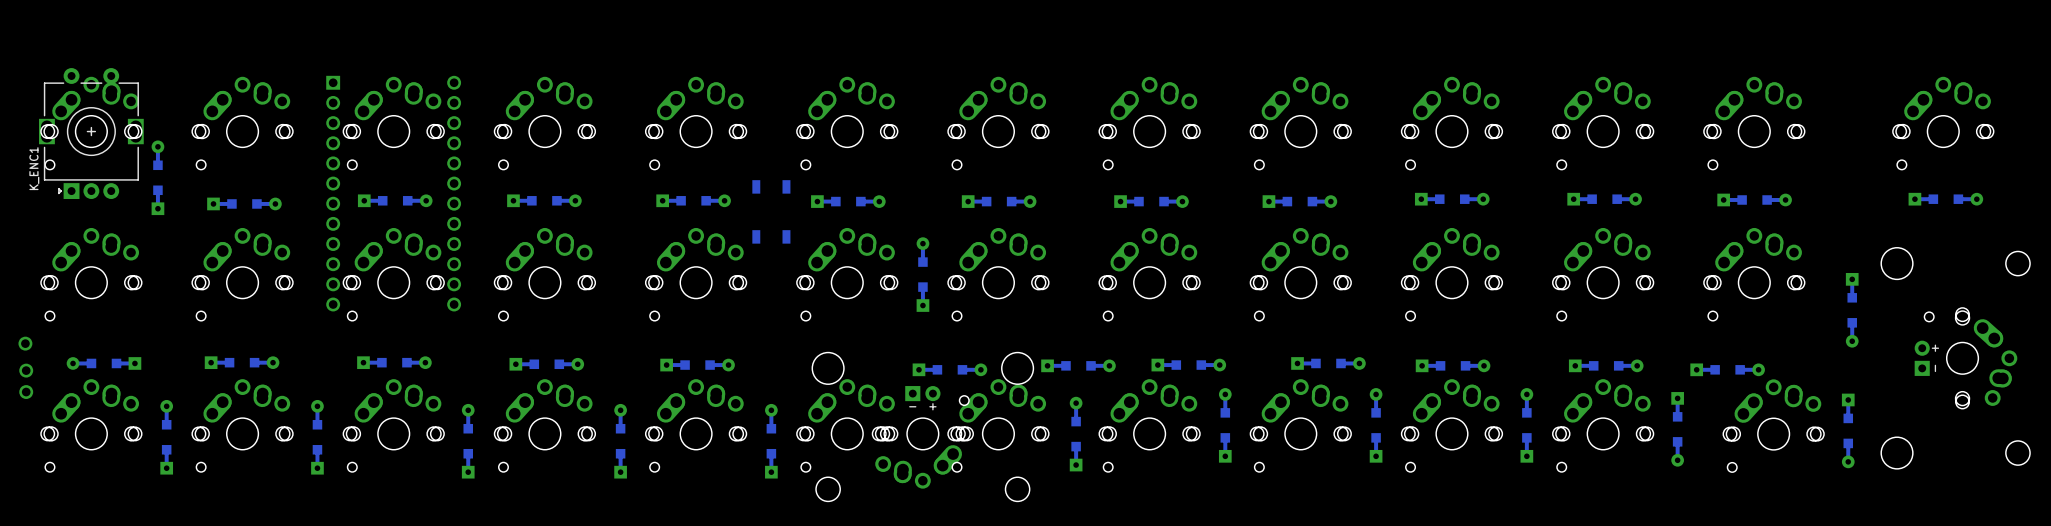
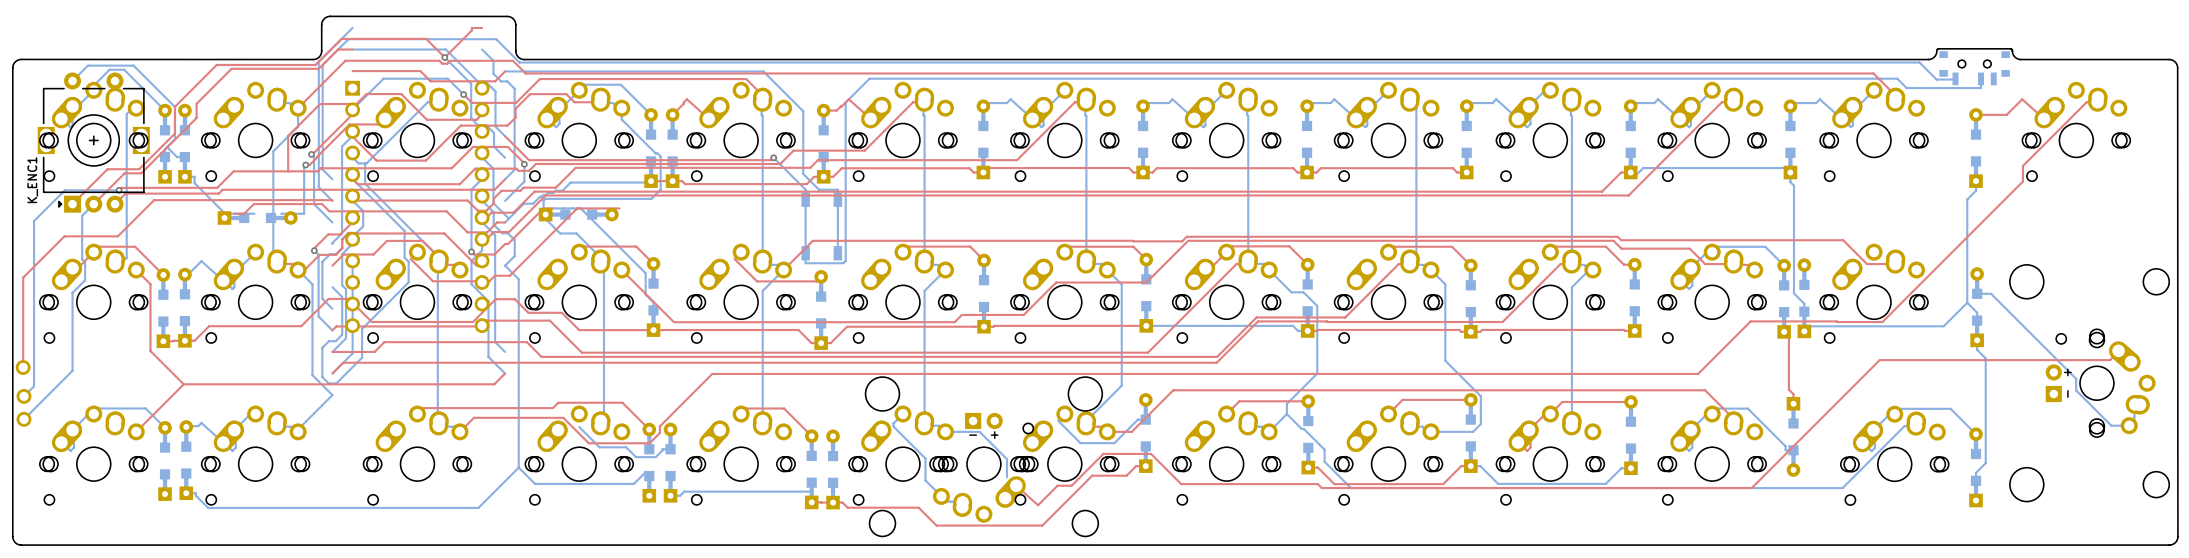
board edge: none -> (515, 24) (516, 53) (519, 57) (524, 59) (1928, 59) (1934, 57) (1936, 51)
board edge: none -> (515, 24) (513, 18) (507, 16) (329, 16) (321, 22) (321, 54) (314, 59) (21, 59) (15, 61) (12, 67) (12, 536) (15, 542) (21, 545) (2169, 545)
bottom track: none -> (352, 27) (318, 61) (318, 187) (332, 200)
top track: none -> (482, 27) (471, 27) (471, 30) (444, 57) (426, 38) (341, 38) (315, 64) (216, 64) (174, 106) (174, 133) (139, 169) (107, 169) (72, 204)
board edge: none -> (2010, 48) (2012, 51)
board edge: none -> (2010, 48) (1938, 48) (1936, 50)
bottom track: none -> (352, 49) (445, 49) (478, 81) (485, 81) (495, 91) (495, 126) (505, 136)
top track: none -> (352, 49) (338, 49) (318, 68) (231, 68) (196, 103) (196, 117) (141, 173) (124, 173) (93, 204)
bottom track: none -> (482, 49) (493, 60) (493, 73) (501, 81) (507, 81) (514, 88) (514, 169) (505, 179)
board edge: none -> (2012, 51) (2014, 57) (2020, 59)
bottom track: none -> (444, 57) (471, 83) (471, 118) (477, 125) (486, 125) (494, 132) (494, 146) (505, 157)
via: none -> (444, 57)
board edge: none -> (2020, 59) (2169, 59) (2174, 61) (2177, 65) (2177, 536) (2175, 542) (2169, 545)
part: none -> (1974, 68)
top track: none -> (352, 71) (420, 71) (430, 81) (495, 81) (505, 71)
bottom track: none -> (505, 71) (763, 71) (803, 111) (803, 173) (819, 189) (837, 189) (837, 253)
bottom track: none -> (1955, 78) (1936, 79) (1919, 62) (519, 62) (496, 39) (348, 39) (322, 64) (322, 169) (332, 179)
bottom track: none -> (1980, 78) (1980, 88) (1906, 88) (1897, 78) (869, 78) (845, 102) (845, 260) (843, 263) (805, 263) (805, 189) (773, 157)
bottom track: none -> (72, 80) (87, 65) (133, 65) (174, 106) (174, 139) (165, 149) (165, 176)
bottom track: none -> (1064, 90) (1048, 106) (1043, 106) (1043, 125) (1041, 127) (1010, 99) (1006, 103) (983, 103) (983, 126)
bottom track: none -> (1226, 90) (1210, 106) (1205, 106) (1205, 125) (1203, 127) (1172, 99) (1168, 103) (1143, 103) (1143, 126)
bottom track: none -> (1388, 90) (1372, 106) (1367, 106) (1367, 125) (1365, 127) (1334, 99) (1330, 103) (1307, 103) (1307, 126)
bottom track: none -> (1550, 90) (1545, 90) (1529, 106) (1530, 124) (1527, 127) (1496, 99) (1492, 103) (1466, 103) (1466, 126)
bottom track: none -> (1712, 90) (1696, 106) (1690, 106) (1690, 125) (1689, 127) (1658, 99) (1654, 103) (1630, 103) (1630, 126)
bottom track: none -> (1874, 90) (1857, 106) (1852, 106) (1852, 125) (1850, 127) (1819, 99) (1816, 103) (1790, 103) (1790, 126)
bottom track: none -> (463, 94) (447, 78) (383, 78) (352, 109) (352, 114)
top track: none -> (463, 94) (471, 102) (516, 102) (539, 79) (746, 79) (762, 95) (762, 102)
via: none -> (463, 94)
bottom track: none -> (277, 97) (276, 102) (289, 103) (294, 108) (298, 108) (298, 126) (273, 151) (273, 255) (277, 259)
bottom track: none -> (439, 97) (438, 102) (427, 102) (366, 163) (358, 163) (352, 157)
bottom track: none -> (600, 97) (600, 102) (613, 103) (618, 108) (621, 108) (621, 119) (660, 156) (660, 189) (651, 198) (545, 198) (543, 200) (543, 216) (560, 233) (576, 233) (600, 257) (600, 264) (604, 267) (604, 417) (600, 420)
top track: none -> (924, 97) (924, 102) (913, 102) (864, 150) (793, 150) (780, 163) (535, 163) (529, 170) (518, 170) (516, 168) (475, 168) (459, 184) (357, 184) (352, 178)
bottom track: none -> (1086, 97) (1086, 263)
bottom track: none -> (1248, 97) (1248, 263)
bottom track: none -> (1571, 97) (1571, 264) (1584, 264) (1589, 270)
top track: none -> (1733, 97) (1733, 102) (1721, 102) (1628, 195) (545, 195) (509, 232) (493, 232) (482, 243)
top track: none -> (1895, 97) (1873, 73) (525, 73) (513, 60) (450, 60) (447, 63) (442, 63) (439, 60) (345, 60) (298, 108)
top track: none -> (600, 102) (574, 102) (566, 94) (530, 94) (515, 108) (515, 117) (507, 125) (460, 125) (425, 160) (376, 160) (352, 135)
bottom track: none -> (762, 102) (762, 259)
bottom track: none -> (924, 102) (924, 264) (940, 264) (945, 270) (924, 290) (924, 425)
top track: none -> (1086, 102) (1074, 102) (1017, 160) (817, 160) (810, 167) (575, 167) (555, 187) (523, 187) (520, 190) (501, 190) (486, 210) (477, 210) (467, 200) (352, 200)
bottom track: none -> (1410, 101) (1416, 108) (1416, 252) (1409, 259) (1409, 264) (1425, 264) (1445, 284) (1445, 360) (1480, 396) (1480, 424) (1473, 431) (1427, 431) (1422, 426) (1409, 425) (1410, 420)
top track: none -> (2097, 102) (2086, 102) (2022, 165) (2022, 181) (1882, 322) (1750, 321) (1698, 373) (712, 373) (659, 426) (659, 432) (649, 443) (588, 443) (563, 417) (473, 417) (459, 431)
bottom track: none -> (136, 108) (132, 108) (126, 114) (126, 257) (115, 259) (115, 264)
top track: none -> (823, 110) (836, 110) (848, 99) (870, 118)
top track: none -> (352, 114) (311, 154)
top track: none -> (482, 114) (476, 119) (426, 119) (401, 94) (366, 94) (356, 104) (320, 104) (288, 136) (288, 171)
top track: none -> (672, 114) (686, 99) (708, 118)
top track: none -> (1976, 114) (2006, 114) (2022, 99) (2043, 118)
bottom track: none -> (61, 118) (70, 127) (72, 125) (72, 106) (77, 106) (93, 90) (93, 85) (109, 69) (124, 69) (165, 110) (165, 130)
top track: none -> (385, 118) (379, 124) (349, 124) (309, 164) (305, 164)
bottom track: none -> (546, 118) (556, 127) (559, 124) (558, 106) (563, 106) (584, 84) (620, 84) (651, 114) (651, 134)
bottom track: none -> (352, 135) (342, 146) (342, 233) (332, 244)
top track: none -> (505, 136) (529, 160) (771, 160) (773, 157)
part: none -> (983, 139)
part: none -> (1143, 139)
part: none -> (1307, 139)
part: none -> (1466, 139)
part: none -> (1630, 139)
part: none -> (1790, 139)
part: none -> (165, 143)
part: none -> (184, 143)
part: none -> (823, 143)
bottom track: none -> (167, 147) (177, 157) (184, 157) (184, 176) (194, 176) (194, 183) (225, 213) (254, 213)
part: none -> (651, 148)
part: none -> (672, 148)
part: none -> (1976, 148)
bottom track: none -> (1630, 152) (1630, 175) (1635, 175) (1643, 168) (1790, 168)
bottom track: none -> (1790, 152) (1790, 182) (1794, 185) (1794, 293) (1804, 303) (1804, 331)
bottom track: none -> (311, 154) (314, 157) (314, 204) (332, 222)
via: none -> (311, 154)
bottom track: none -> (482, 157) (493, 168) (493, 203) (508, 218)
via: none -> (773, 157)
bottom track: none -> (1976, 161) (1976, 190) (1967, 199) (1967, 302)
bottom track: none -> (365, 163) (365, 183) (439, 259)
bottom track: none -> (524, 164) (524, 181) (505, 200)
top track: none -> (524, 164) (507, 146) (473, 146) (451, 168) (321, 168) (317, 171) (233, 171) (217, 187) (121, 187) (119, 190)
via: none -> (524, 164)
bottom track: none -> (305, 164) (304, 166) (304, 213) (281, 213)
via: none -> (305, 164)
top track: none -> (981, 172) (986, 168) (1128, 168) (1133, 172) (1152, 172) (1156, 168) (1293, 168) (1297, 172) (1316, 172) (1320, 168) (1452, 168) (1457, 172) (1466, 172)
top track: none -> (983, 172) (973, 172) (969, 168) (841, 168) (833, 176) (814, 176) (806, 184) (685, 184) (682, 181) (651, 181)
top track: none -> (1630, 172) (1621, 172) (1602, 191) (534, 191) (513, 212) (491, 212) (482, 222)
bottom track: none -> (651, 176) (644, 182) (570, 182) (562, 190) (548, 192) (540, 196) (533, 203) (523, 203) (505, 222)
bottom track: none -> (352, 178) (404, 230) (404, 257) (408, 261) (408, 282) (362, 328) (362, 357) (336, 383) (328, 383) (322, 377) (322, 347) (329, 341) (335, 341) (342, 334) (342, 296) (332, 287)
bottom track: none -> (482, 178) (471, 189) (471, 251)
top track: none -> (505, 179) (494, 189) (222, 189) (218, 193) (125, 193) (115, 204)
part: (157, 177) -> none
bottom track: none -> (119, 190) (64, 190) (34, 221) (34, 386) (24, 396)
via: none -> (119, 190)
bottom track: none -> (352, 200) (363, 211) (363, 226) (356, 232) (348, 232) (342, 239) (342, 247) (335, 254) (330, 254) (322, 261) (322, 298) (332, 308)
bottom track: none -> (482, 200) (493, 212) (493, 224) (502, 233) (507, 233) (514, 240) (514, 256) (505, 265) (518, 279) (518, 467)
top track: none -> (332, 200) (154, 200) (117, 236) (64, 236) (23, 277) (23, 367)
bottom track: none -> (93, 204) (82, 215) (82, 259) (85, 262) (85, 280) (72, 292) (72, 370) (24, 419)
bottom track: none -> (553, 208) (580, 208) (645, 273) (645, 294) (653, 302) (653, 330)
top track: none -> (553, 208) (543, 208) (507, 244) (505, 244) (494, 254) (474, 254) (471, 251)
top track: none -> (619, 208) (577, 208) (509, 275) (495, 275) (489, 281) (432, 281) (410, 258)
top track: none -> (234, 213) (244, 213) (253, 204) (322, 204) (329, 211) (446, 211) (467, 232) (487, 232) (497, 222) (505, 222)
part: (1452, 199) -> none
part: (1604, 199) -> none
part: (1754, 199) -> none
part: (1945, 199) -> none
part: (395, 200) -> none
part: (693, 200) -> none
part: (848, 201) -> none
part: (999, 201) -> none
part: (1151, 201) -> none
part: (1299, 201) -> none
top track: none -> (352, 222) (340, 234) (328, 234) (314, 248) (314, 250)
bottom track: none -> (482, 222) (495, 235) (495, 342) (505, 351)
bottom track: none -> (352, 243) (342, 254) (342, 285) (346, 289) (346, 338) (332, 351)
bottom track: none -> (482, 243) (482, 250) (471, 260) (471, 284) (488, 301) (488, 356) (505, 373)
bottom track: none -> (314, 250) (318, 254) (318, 316) (332, 330)
via: none -> (314, 250)
bottom track: none -> (255, 252) (239, 268) (234, 268) (234, 287) (232, 289) (201, 261) (188, 274) (184, 274) (184, 294)
via: none -> (471, 251)
top track: none -> (579, 252) (584, 246) (636, 246) (653, 263)
top track: none -> (902, 252) (908, 246) (970, 246) (984, 260)
top track: none -> (1064, 252) (1070, 246) (1133, 246) (1146, 259)
top track: none -> (1388, 252) (1393, 246) (1452, 246) (1470, 265)
top track: none -> (1550, 252) (1555, 246) (1605, 246) (1623, 264) (1634, 264)
top track: none -> (734, 258) (757, 281) (816, 281) (821, 276)
top track: none -> (276, 264) (291, 263) (298, 270) (304, 270) (319, 254) (335, 254) (342, 248) (342, 239) (348, 233) (444, 233) (476, 265) (482, 265)
bottom track: none -> (438, 264) (437, 419) (438, 425) (454, 426) (459, 431)
bottom track: none -> (762, 264) (778, 264) (783, 270) (762, 290) (762, 425)
bottom track: none -> (1086, 264) (1101, 263) (1121, 284) (1121, 385) (1086, 421) (1086, 425)
bottom track: none -> (1247, 264) (1263, 263) (1291, 292) (1303, 292) (1317, 306) (1317, 373) (1286, 403) (1286, 414)
top track: none -> (1247, 264) (1236, 264) (1147, 352) (581, 352) (549, 320) (486, 320) (480, 326) (336, 326) (332, 330)
top track: none -> (1307, 264) (1289, 246) (1232, 246) (1210, 268) (1205, 268)
top track: none -> (1409, 264) (1398, 264) (1345, 317) (1256, 317) (1217, 356) (541, 356) (526, 342) (384, 342) (374, 351) (332, 351)
top track: none -> (1571, 264) (1560, 264) (1502, 322) (1258, 321) (1216, 362) (343, 362) (332, 373)
top track: none -> (1895, 264) (1867, 264) (1843, 240) (1621, 240) (1617, 236) (1186, 236) (1182, 241) (812, 240) (783, 270)
top track: none -> (332, 265) (343, 254) (373, 254) (387, 240) (422, 240) (439, 257) (438, 264) (454, 264) (459, 270)
bottom track: none -> (352, 265) (352, 353) (332, 373)
top track: none -> (72, 268) (77, 268) (99, 246) (135, 246) (163, 274)
top track: none -> (136, 270) (150, 284) (150, 351) (183, 384)
bottom track: none -> (298, 270) (312, 284) (312, 375) (332, 395) (300, 426) (276, 425) (277, 420)
top track: none -> (621, 270) (673, 322) (954, 322) (961, 314) (1023, 314) (1056, 282) (1146, 282) (1188, 240) (1613, 240) (1621, 248) (1689, 248) (1705, 264) (1749, 264) (1754, 270)
bottom track: none -> (1589, 270) (1571, 287) (1571, 425)
bottom track: none -> (1977, 274) (1977, 293) (1991, 293) (2076, 378) (2076, 390) (2111, 425) (2129, 425) (2134, 420) (2135, 404)
bottom track: none -> (1679, 280) (1689, 289) (1692, 285) (1690, 268) (1707, 252) (1712, 252) (1717, 246) (1765, 246) (1784, 265) (1784, 285)
part: none -> (1146, 292)
part: none -> (653, 296)
part: none -> (1307, 297)
part: none -> (1634, 297)
part: none -> (1804, 298)
part: none -> (1470, 298)
part: none -> (1784, 298)
bottom track: none -> (1967, 302) (1977, 312) (1977, 349) (1985, 358) (1985, 463) (1976, 472) (1976, 500)
bottom track: none -> (1967, 302) (1943, 326) (1804, 326)
bottom track: none -> (1146, 306) (1146, 325) (1293, 325) (1298, 330) (1307, 330) (1307, 311)
part: none -> (184, 307)
part: none -> (163, 308)
part: none -> (821, 309)
top track: none -> (1146, 325) (847, 326) (830, 343) (811, 343) (798, 329) (579, 330) (561, 312) (528, 312) (514, 299) (495, 299) (472, 322) (371, 322) (348, 298) (328, 298) (301, 326) (209, 326) (194, 340) (163, 341)
top track: none -> (1307, 330) (1634, 330)
top track: none -> (1788, 331) (1788, 389) (1793, 394) (1793, 403)
part rotation: 0° (1852, 310) -> 180° (1977, 307)
top track: none -> (2118, 350) (2110, 360) (1879, 360) (1751, 488) (1321, 488) (1317, 484) (1181, 484) (1151, 453) (1103, 453) (1071, 485) (1057, 485) (1038, 505) (1016, 485)
top track: none -> (505, 373) (494, 384) (183, 384)
top track: none -> (183, 384) (136, 431)
part: (242, 362) -> none
part: (394, 362) -> none
part: (103, 363) -> none
part: (1328, 363) -> none
part: (546, 364) -> none
part: (697, 365) -> none
part: (1078, 365) -> none
part: (1188, 365) -> none
part: (1453, 365) -> none
part: (1606, 365) -> none
part: (949, 369) -> none
part: (1727, 369) -> none
top track: none -> (1470, 399) (1402, 399) (1388, 414)
top track: none -> (1308, 401) (1239, 401) (1226, 414)
top track: none -> (1630, 402) (1562, 402) (1550, 414) (1545, 414) (1529, 430) (1530, 447) (1527, 450) (1517, 442)
bottom track: none -> (255, 414) (250, 414) (234, 430) (235, 447) (232, 450) (201, 423) (198, 426) (186, 426) (186, 446)
top track: none -> (417, 414) (423, 408) (552, 408) (558, 402) (622, 402) (649, 429)
top track: none -> (741, 414) (746, 408) (784, 408) (811, 436)
bottom track: none -> (902, 414) (893, 423) (893, 426) (925, 458) (925, 480) (946, 501) (962, 502) (962, 507)
bottom track: none -> (1286, 414) (1274, 426) (1247, 425) (1248, 420)
bottom track: none -> (1286, 414) (1324, 449) (1324, 461) (1351, 488) (1842, 488) (1904, 426) (1916, 426) (1916, 421)
bottom track: none -> (1145, 419) (1137, 419) (1114, 443) (1080, 443) (1058, 420)
top track: none -> (1733, 420) (1705, 390) (1173, 390) (1131, 431) (1107, 431) (1102, 426) (1086, 425)
bottom track: none -> (924, 425) (939, 425) (945, 431) (979, 431) (1006, 459) (1006, 477)
bottom track: none -> (579, 427) (599, 447) (626, 447) (636, 457) (655, 457) (662, 449) (670, 449)
part: none -> (1145, 433)
bottom track: none -> (61, 442) (70, 450) (73, 447) (72, 430) (88, 414) (93, 414) (99, 408) (145, 408) (165, 427) (165, 447)
bottom track: none -> (1679, 442) (1689, 450) (1692, 447) (1690, 430) (1707, 414) (1712, 414) (1717, 408) (1747, 408) (1785, 446) (1785, 450) (1793, 450) (1793, 470)
bottom track: none -> (1862, 442) (1871, 451) (1874, 447) (1873, 430) (1889, 414) (1894, 414) (1900, 408) (1950, 408) (1976, 434) (1976, 454)
bottom track: none -> (1470, 446) (1470, 466) (1480, 466) (1498, 483) (1605, 483) (1621, 468) (1630, 468) (1630, 448)
part position: (1225, 425) -> (1308, 434)
part position: (1376, 425) -> (1470, 433)
part position: (1526, 425) -> (1630, 435)
part position: (1677, 429) -> (1793, 436)
part: none -> (165, 460)
part: none -> (186, 460)
part rotation: 0° (1848, 430) -> 180° (1976, 467)
part: none -> (649, 462)
part: none -> (670, 462)
part: (1076, 434) -> none
top track: none -> (1145, 466) (1136, 466) (1126, 475) (1092, 475) (1042, 525) (936, 525) (918, 507) (847, 507) (842, 502) (811, 502)
top track: none -> (1470, 466) (1461, 466) (1443, 484) (1334, 484) (1317, 467) (1308, 467)
part: (166, 437) -> none
part: (317, 437) -> none
bottom track: none -> (518, 467) (478, 507) (208, 507) (195, 495) (195, 493) (186, 493) (186, 473)
bottom track: none -> (518, 467) (535, 483) (633, 483) (645, 472) (649, 472) (649, 495)
part: none -> (811, 469)
part: none -> (833, 469)
part: (468, 441) -> none
part: (620, 441) -> none
part: (771, 441) -> none
bottom track: none -> (811, 491) (684, 491) (680, 495) (670, 495)

